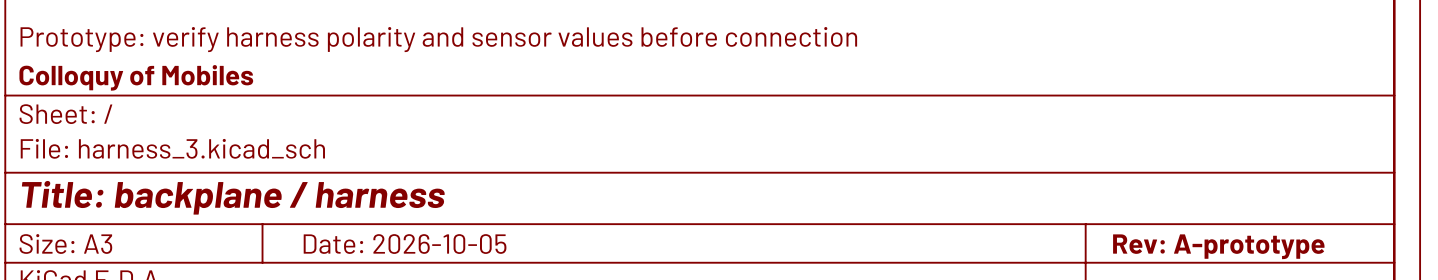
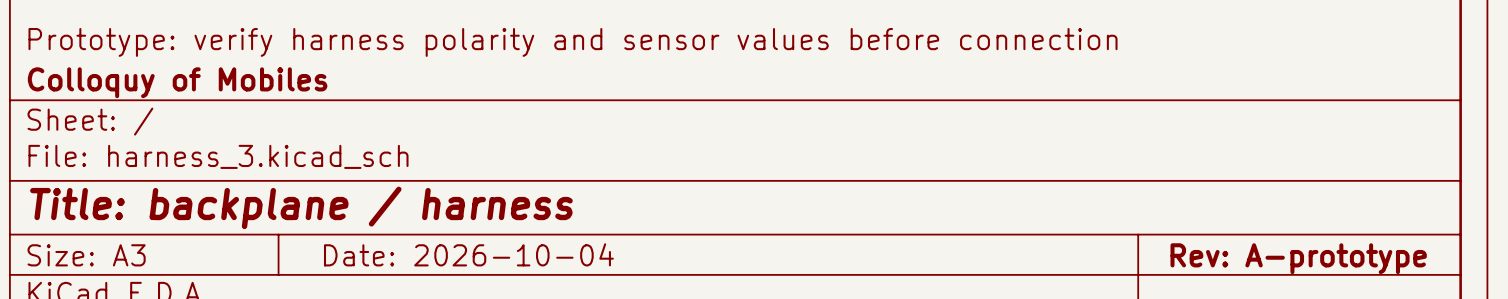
title block: Date: 2026-10-05 (405, 244) -> Date: 2026-10-04 (468, 254)

